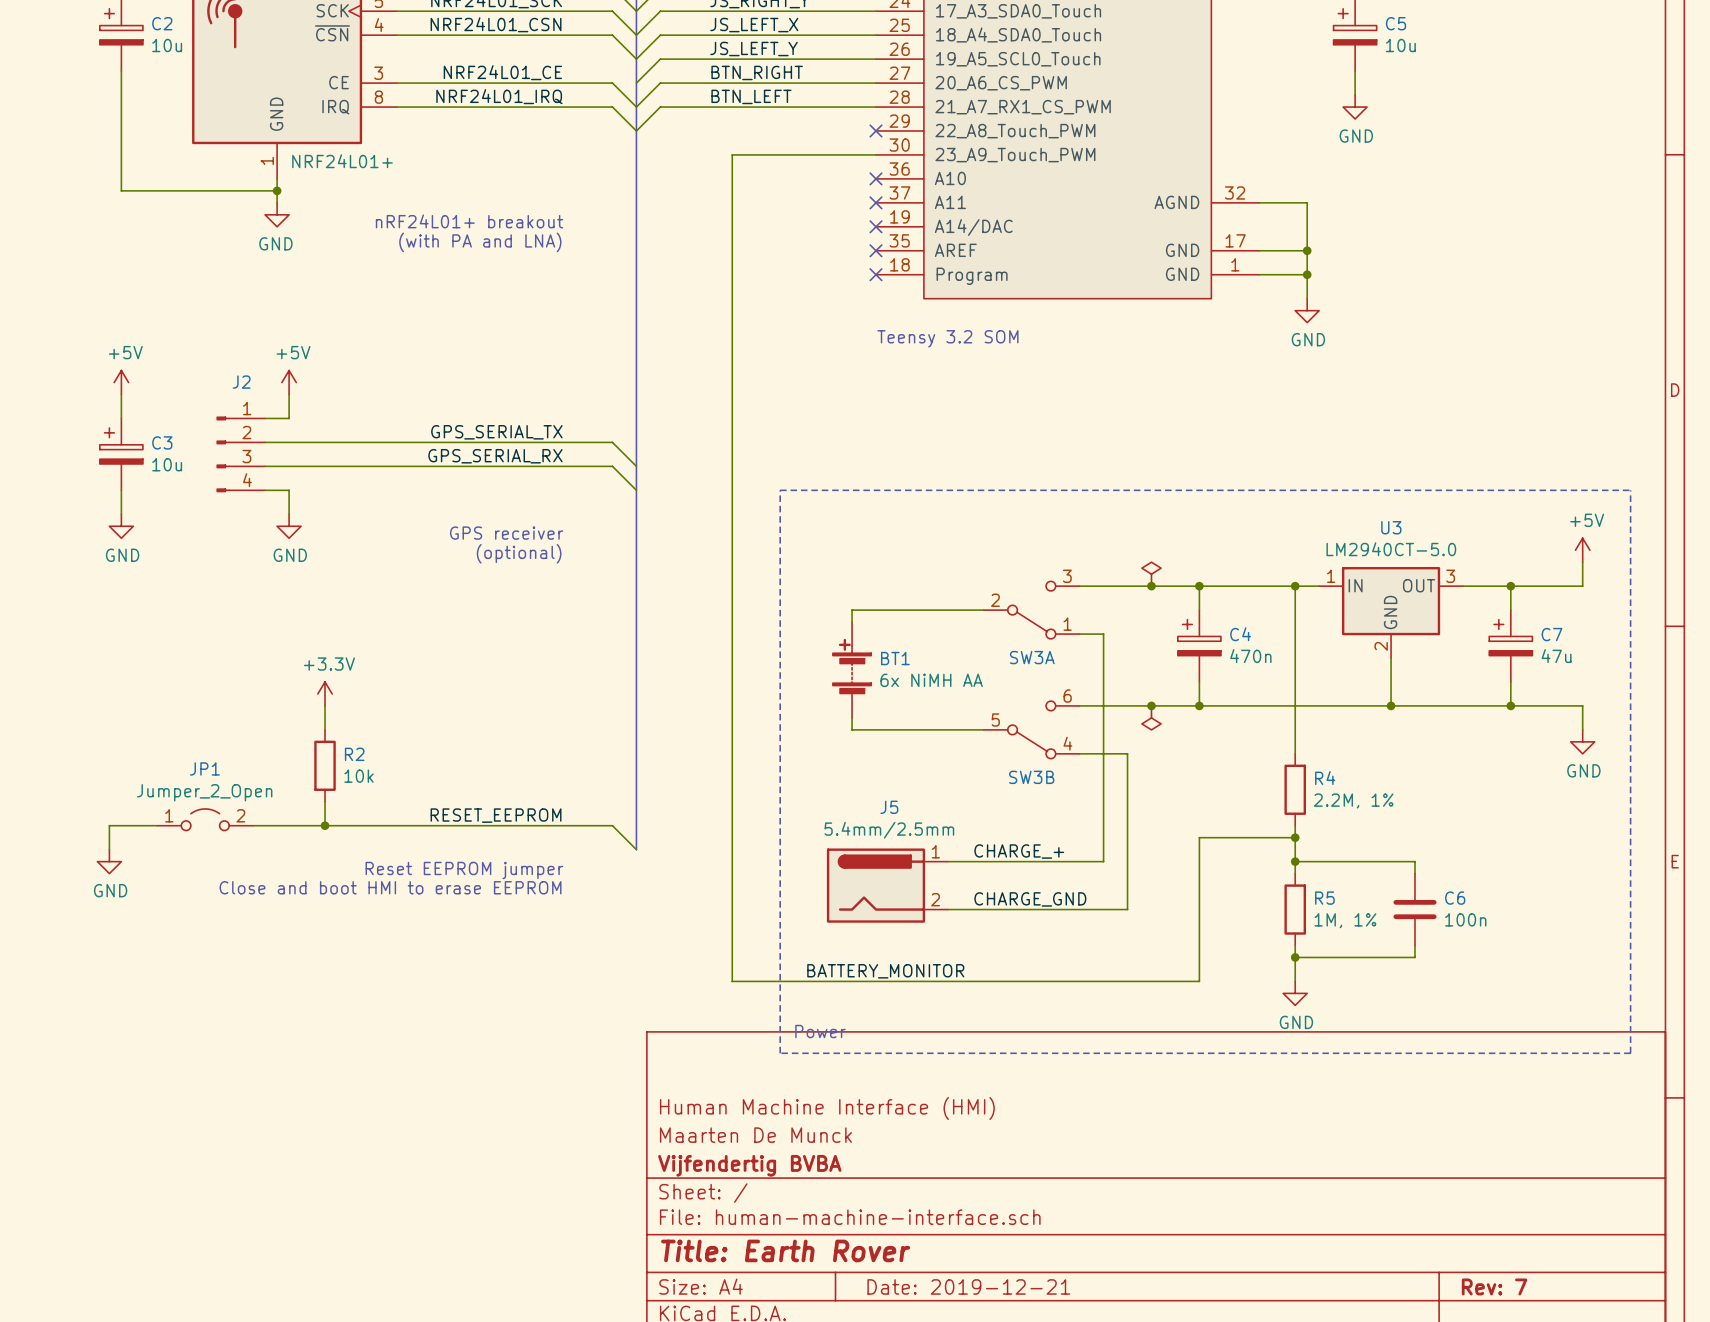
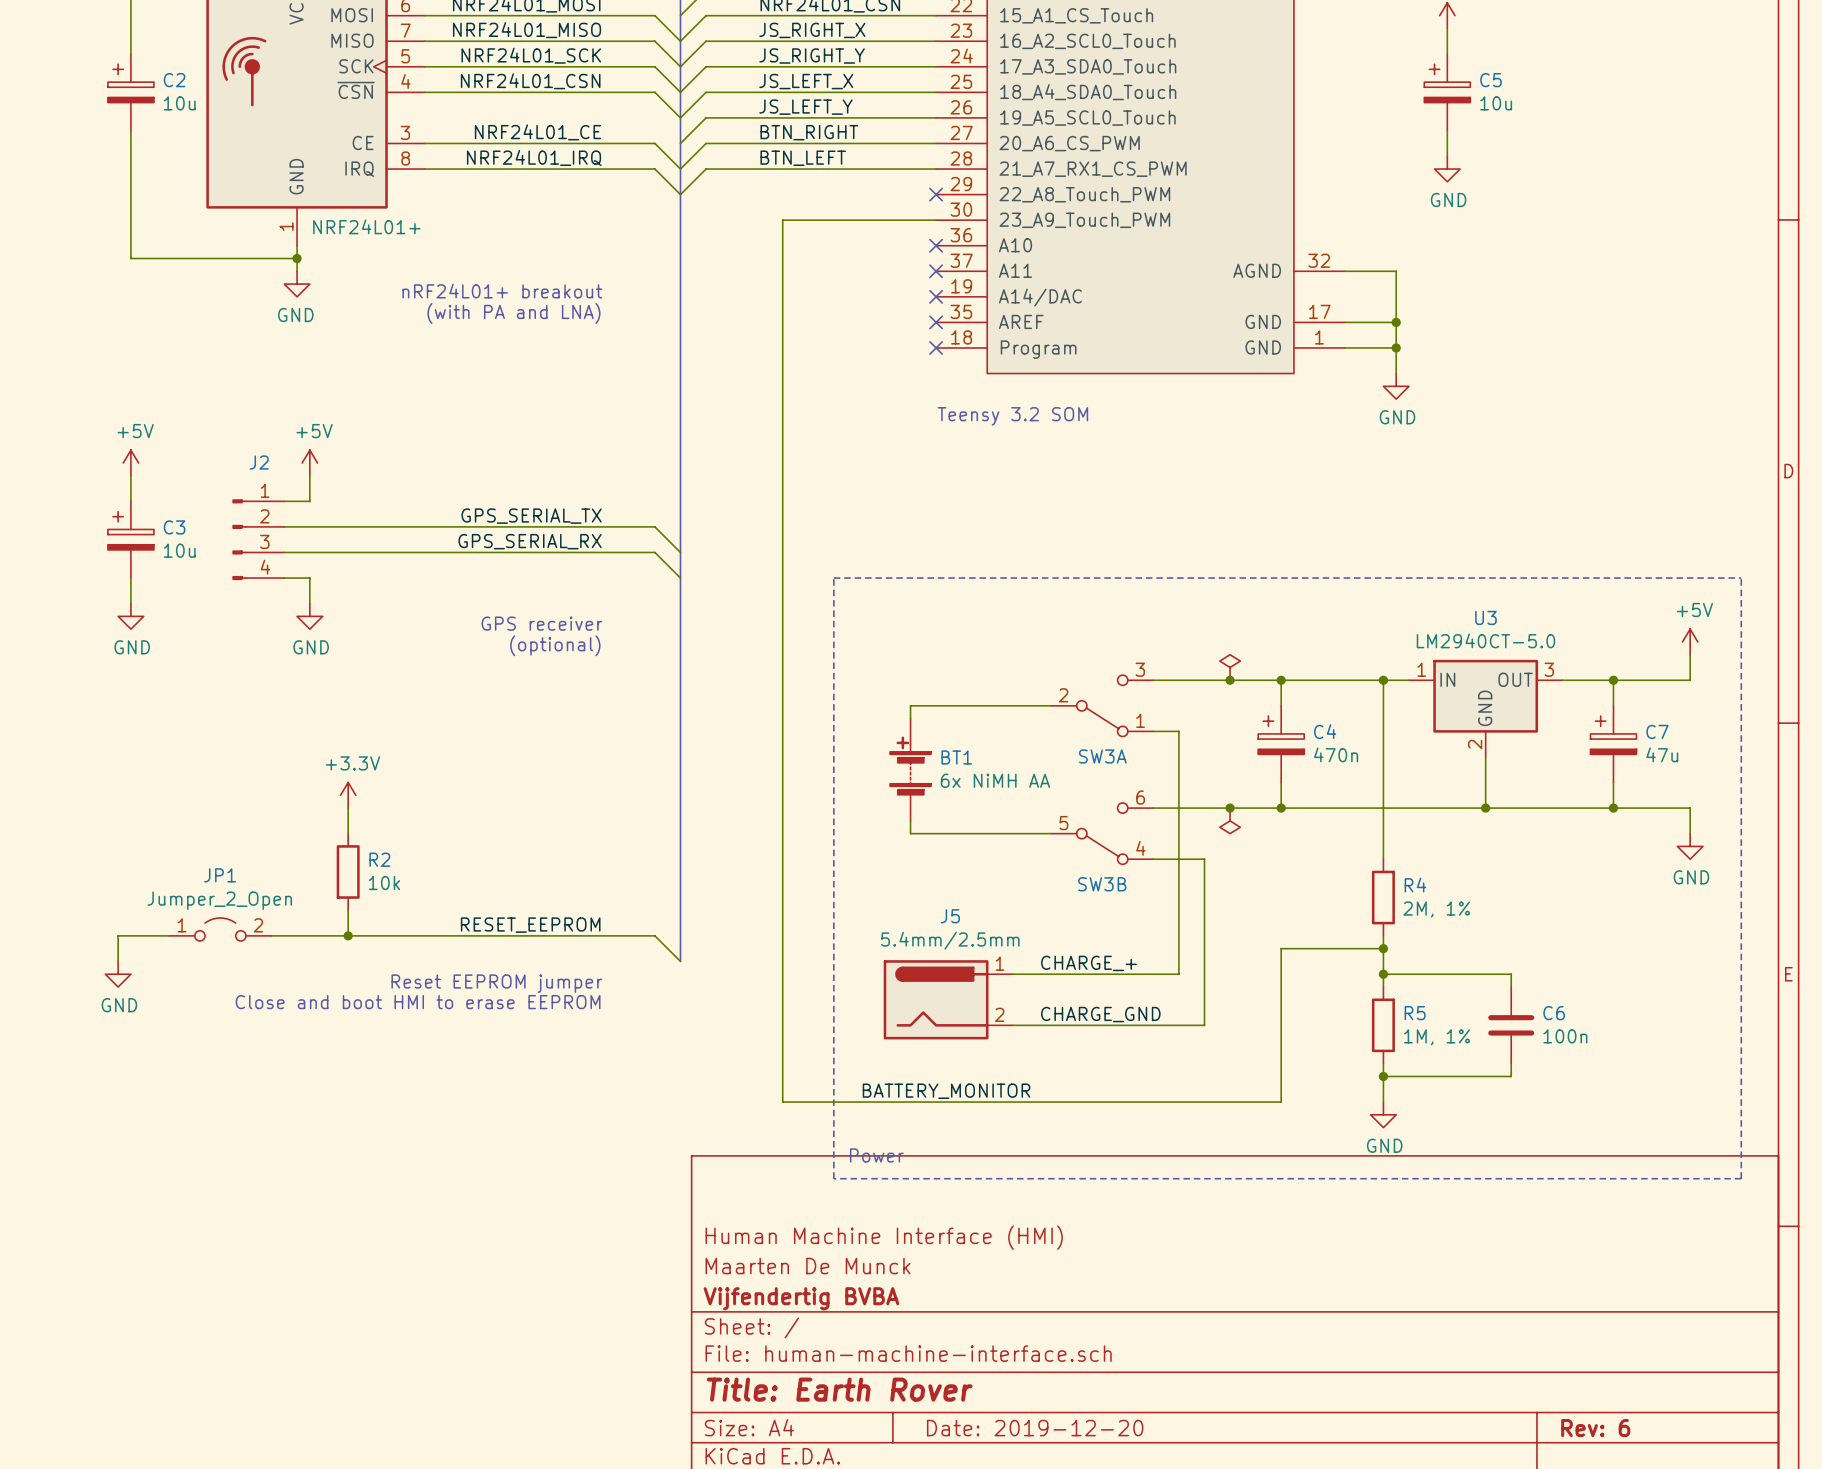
R4 value: 2.2M, 1% (1353, 800) -> 2M, 1% (1436, 909)
title block: Date: 2019-12-21 (968, 1286) -> Date: 2019-12-20 (1035, 1428)
title block: Rev: 7 (1494, 1286) -> Rev: 6 (1595, 1428)

